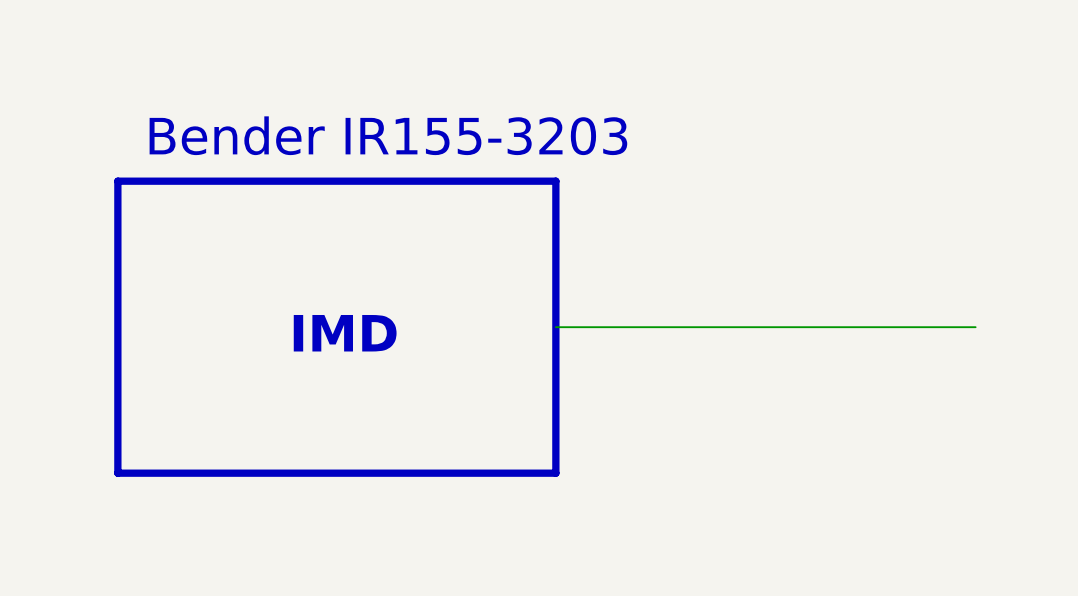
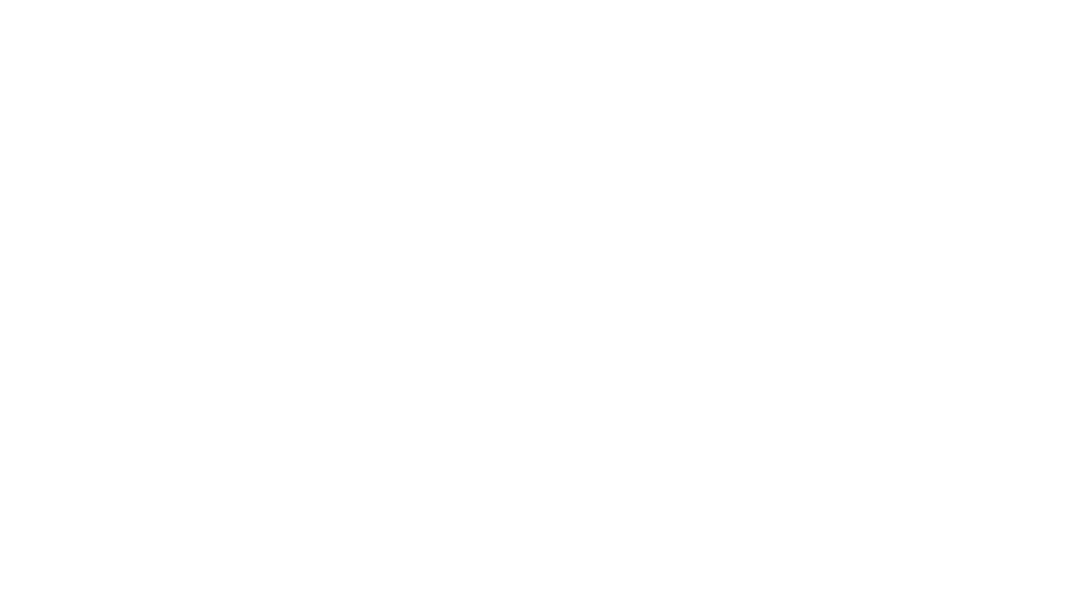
text: Bender IR155-3203 (388, 135) -> none
line: (117, 181) (555, 181) (555, 473) (117, 473) (117, 181) -> none
wire: (555, 327) (975, 327) -> none
text: IMD (345, 333) -> none

